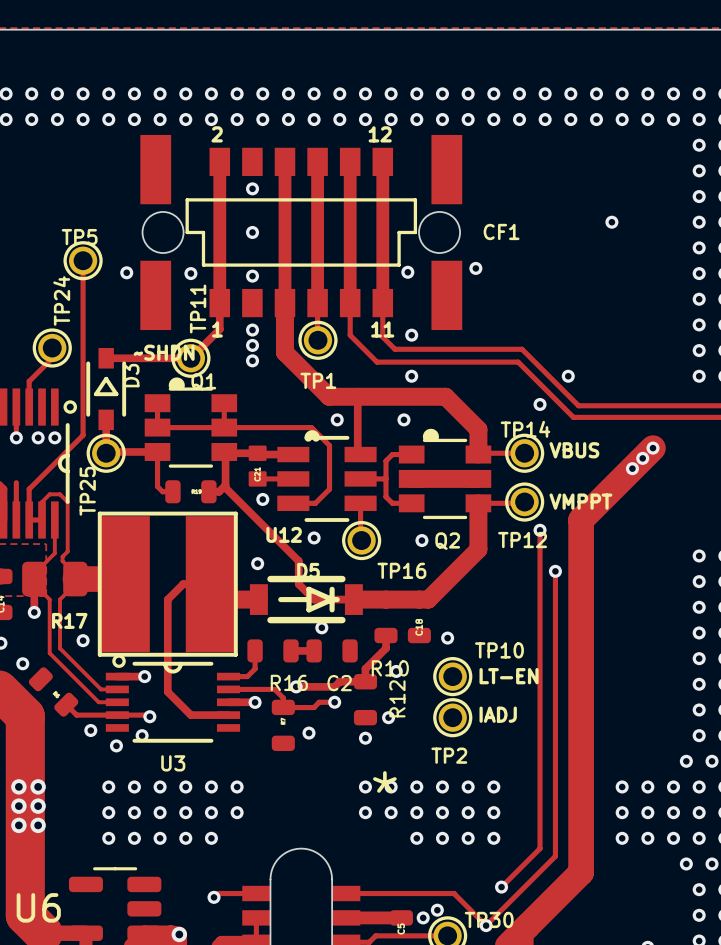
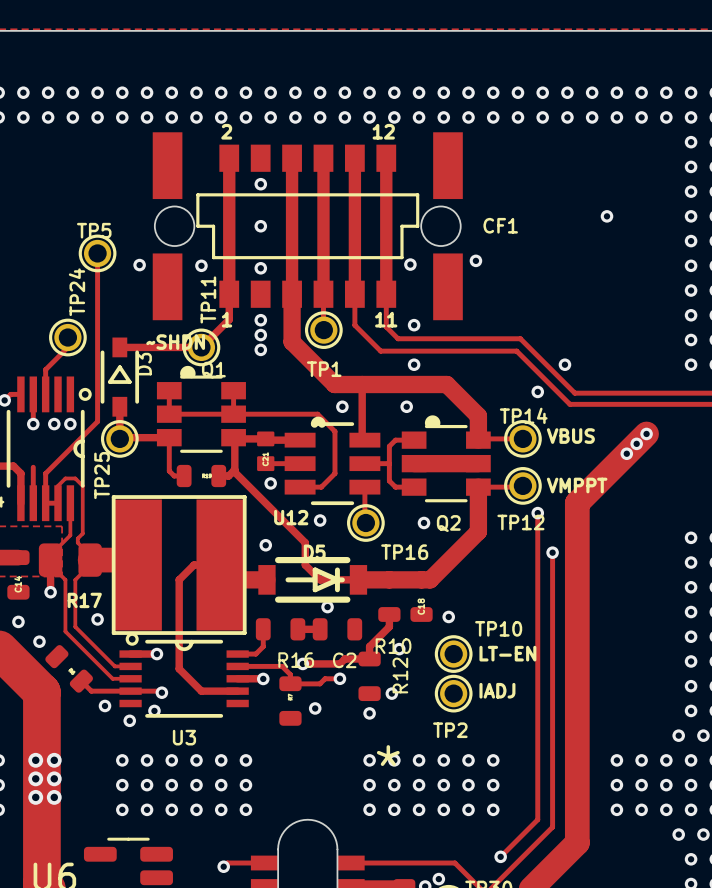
via: none -> (245, 809)
via: none -> (369, 809)
via: none -> (394, 809)

